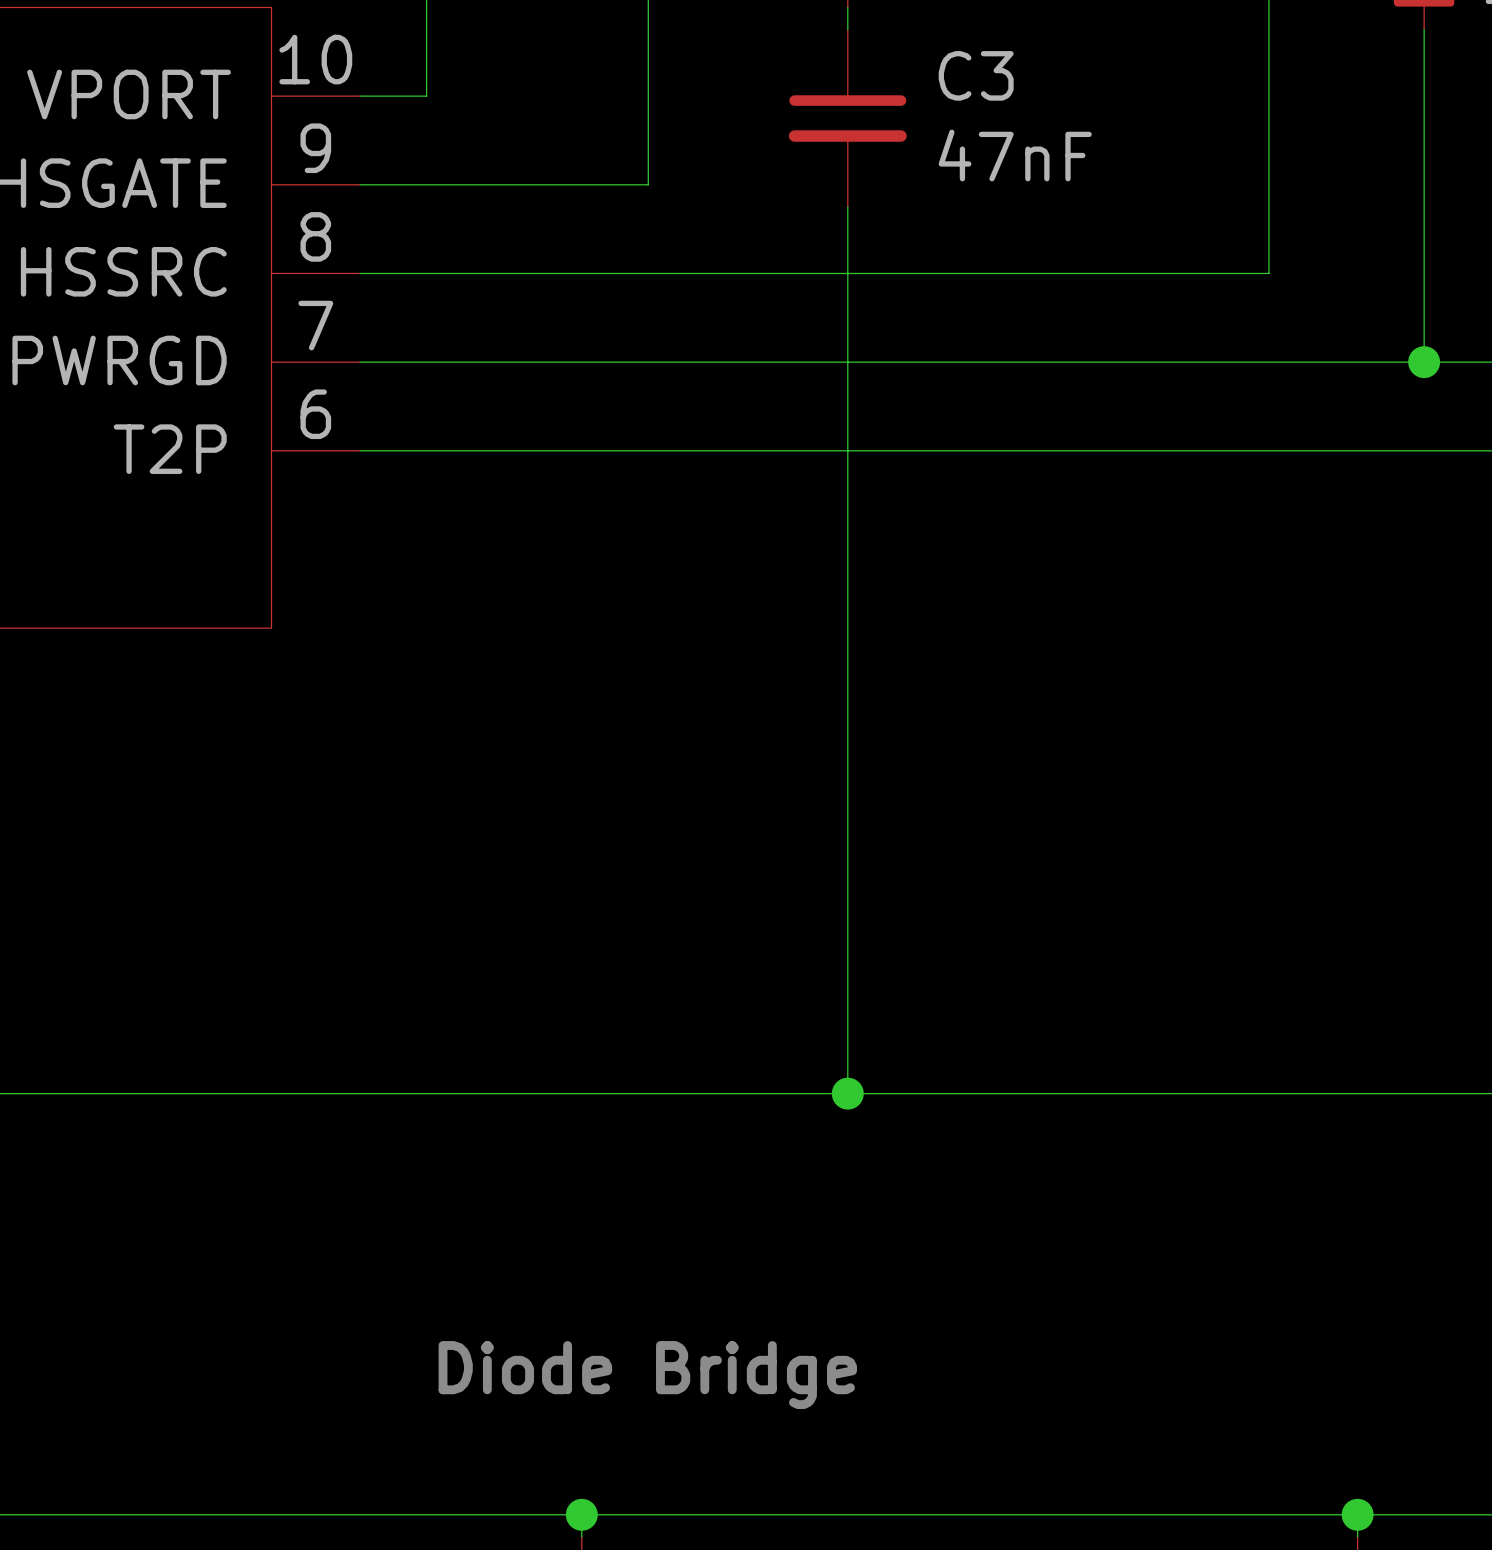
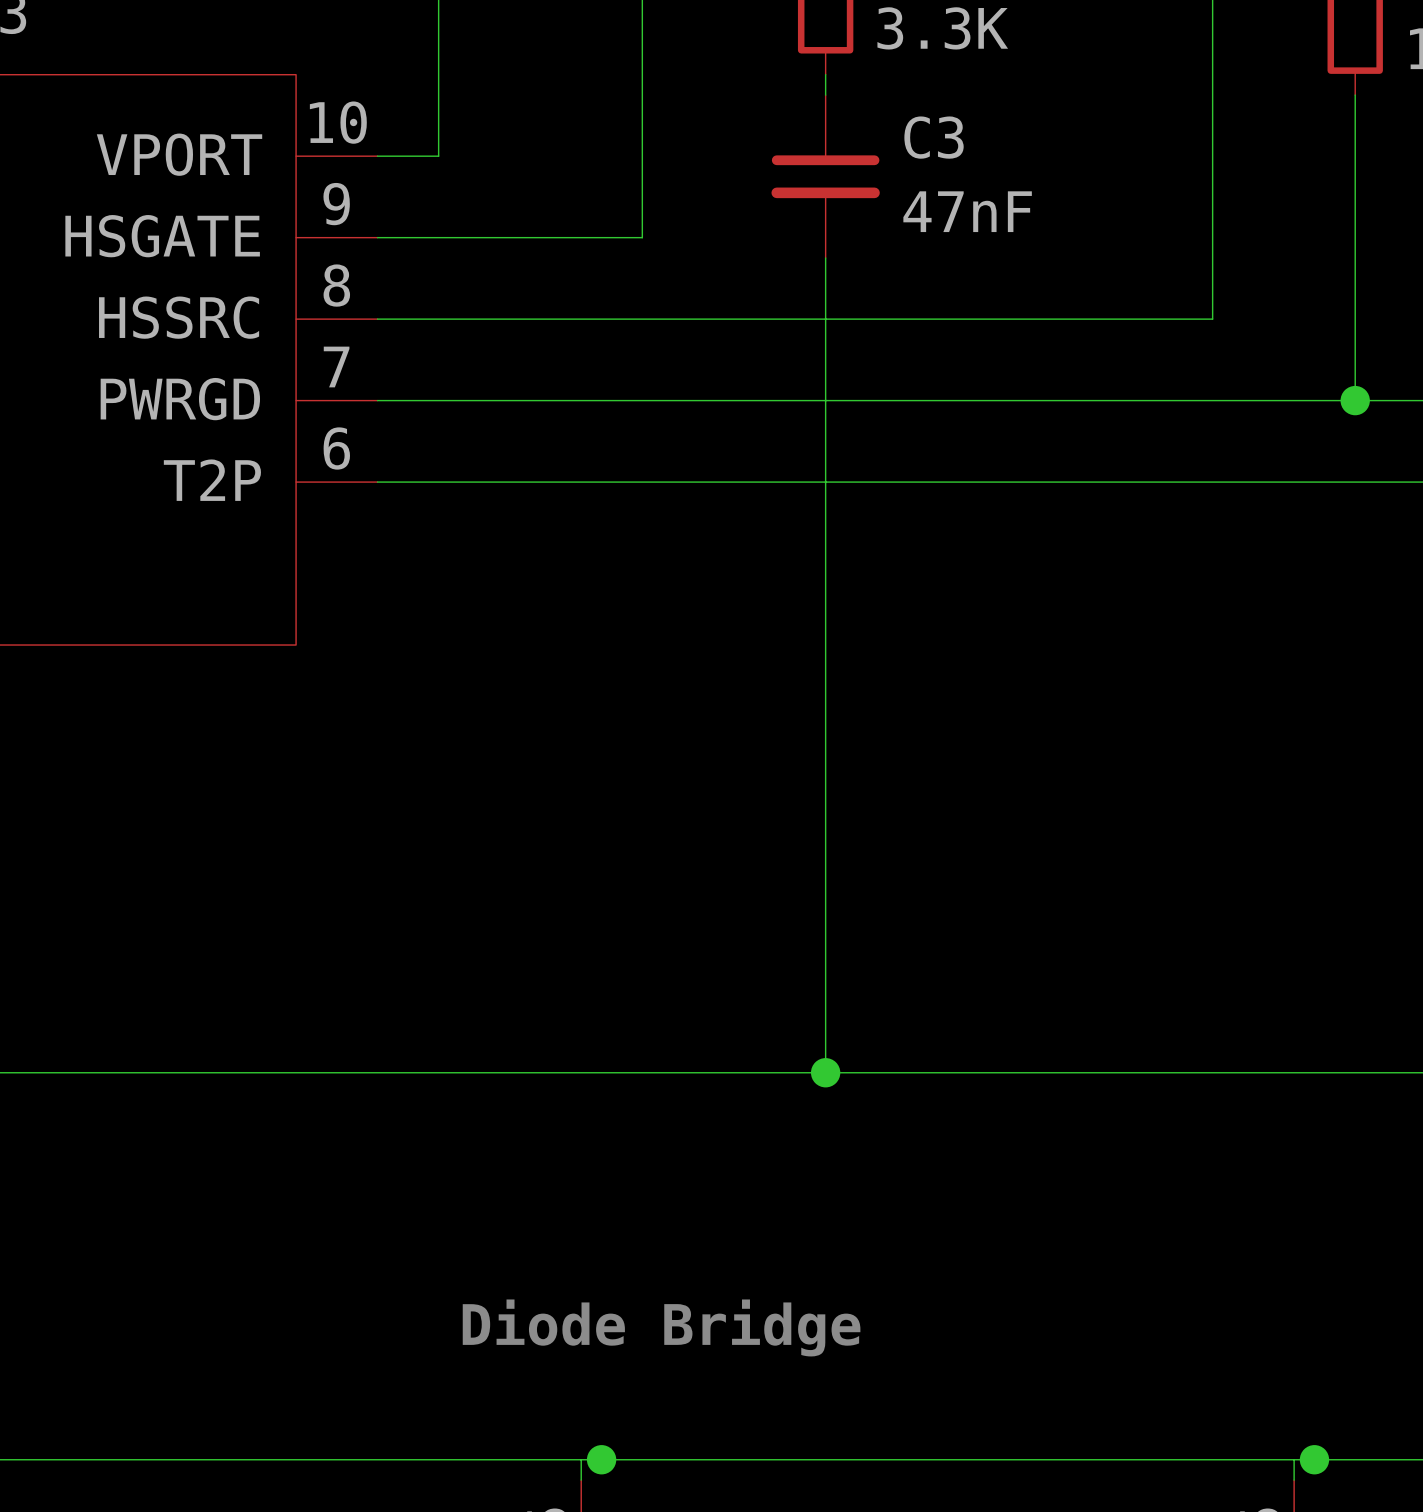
text position: Diode Bridge (647, 1375) -> Diode Bridge (661, 1327)
junction position: (581, 1514) -> (601, 1459)
junction position: (1357, 1514) -> (1314, 1459)

